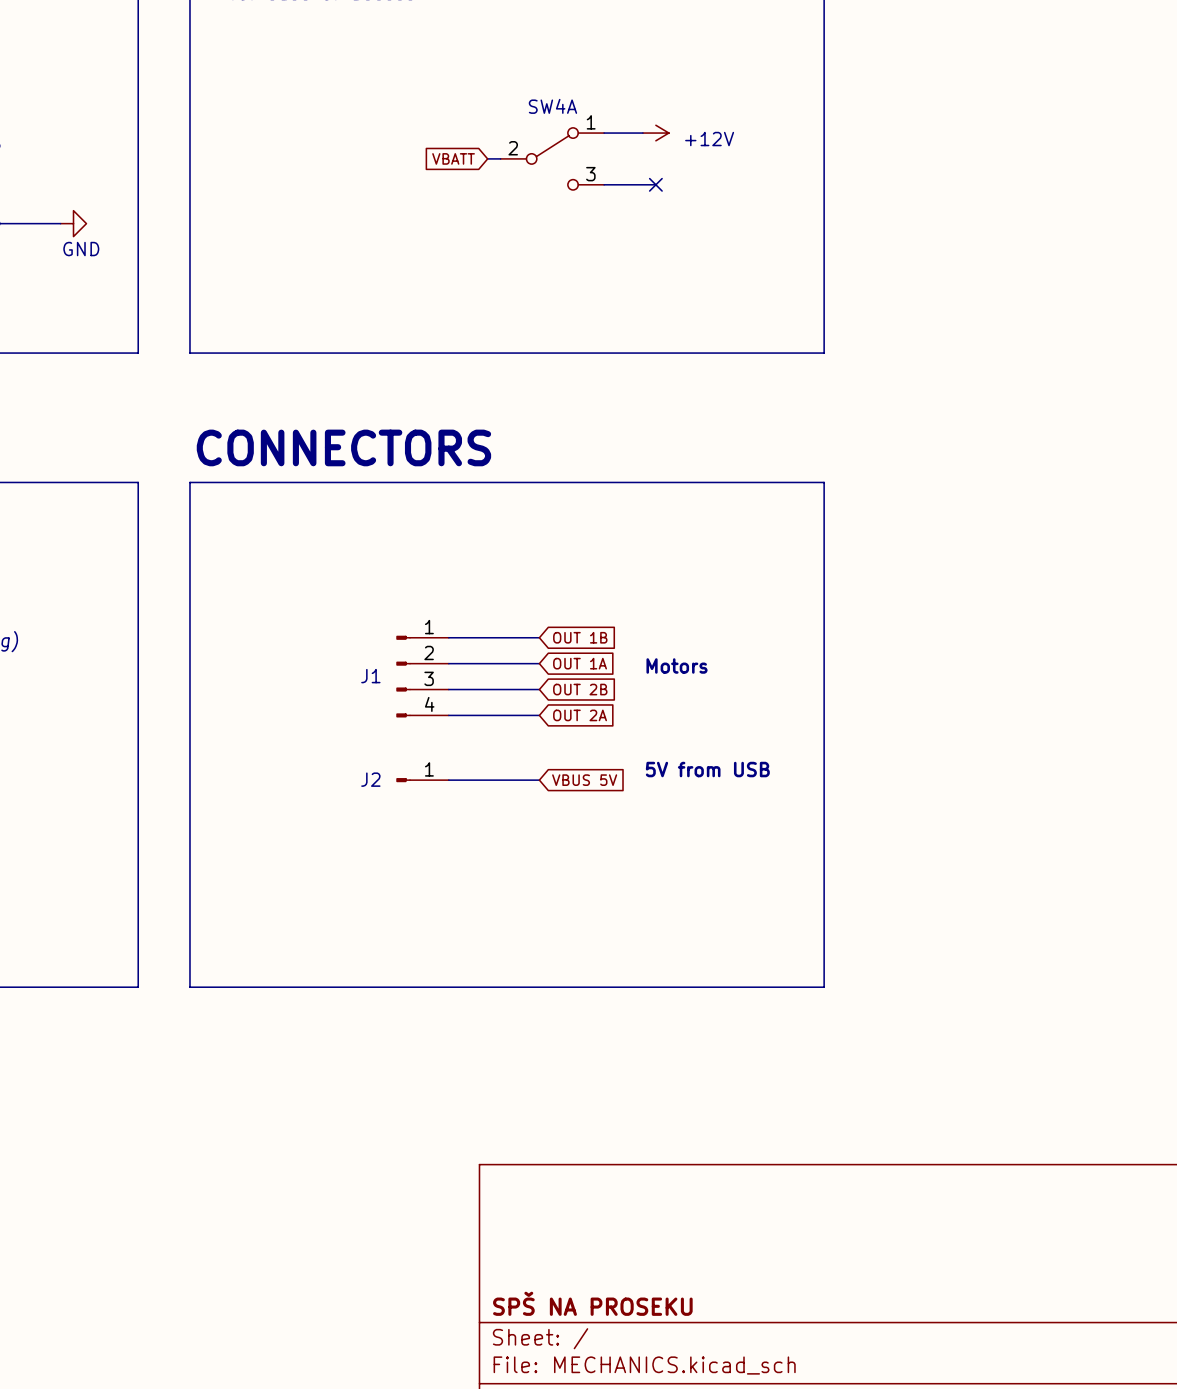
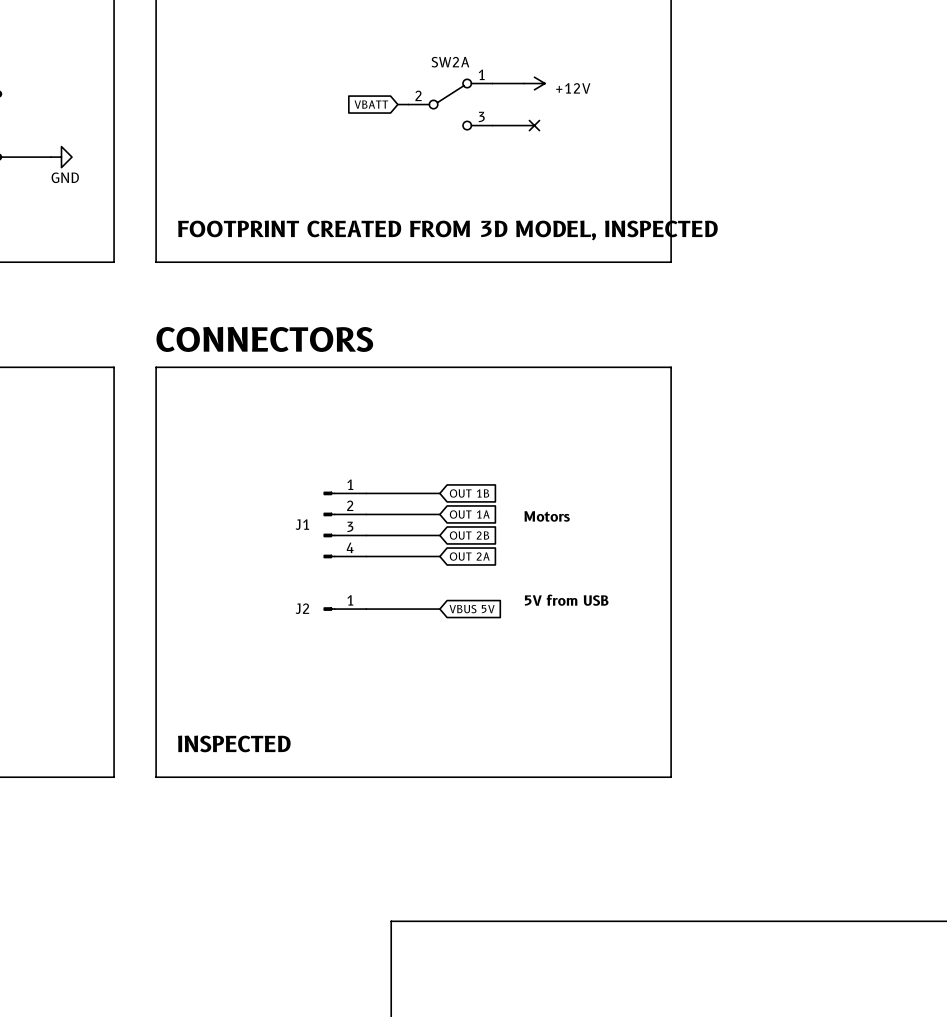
SW4A name: SW4A (552, 106) -> SW2A (450, 62)
text: none -> FOOTPRINT CREATED FROM 3D MODEL, INSPECTED (447, 230)
text: none -> INSPECTED (234, 743)

